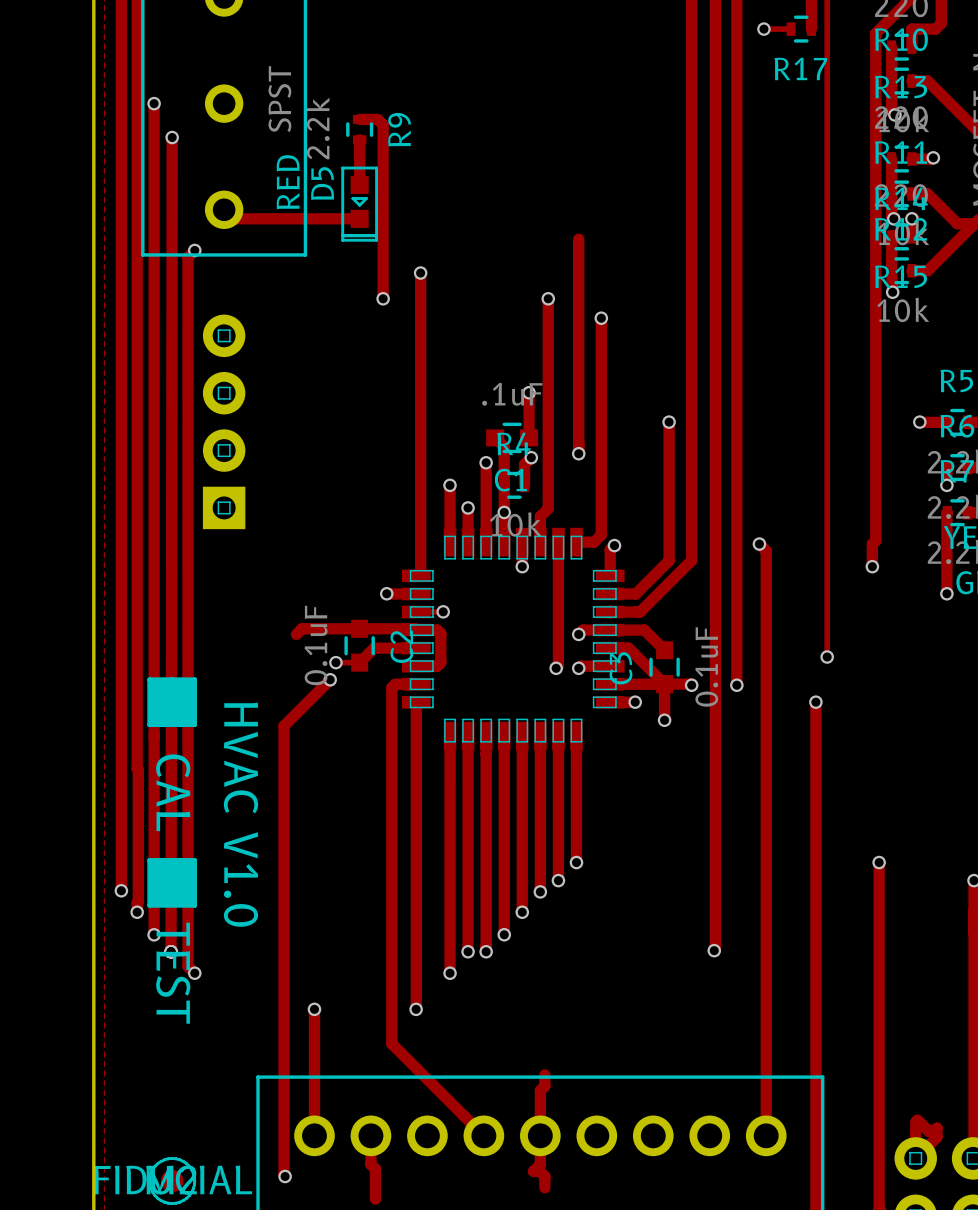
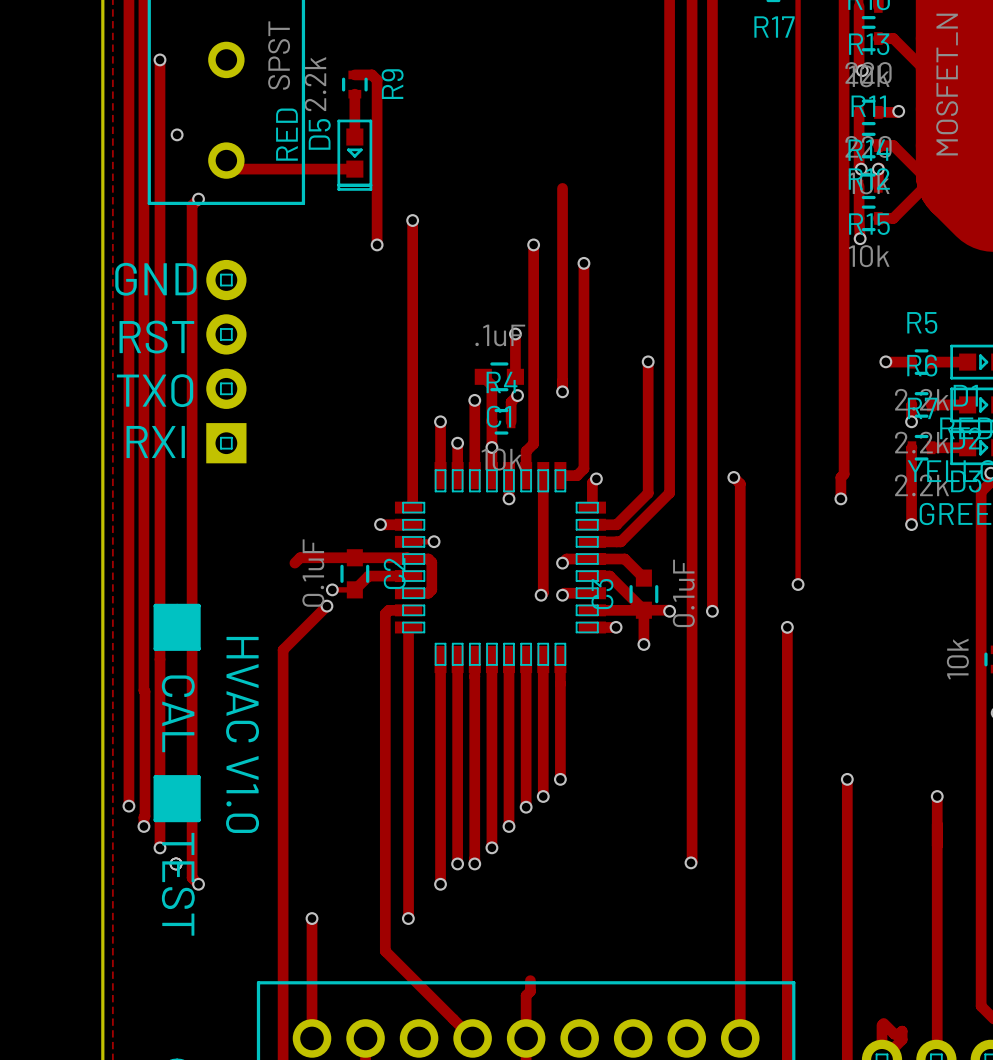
track: (172, 137) (171, 951) -> none
via position: (172, 137) -> (177, 134)
text: none -> GND (155, 279)
text: none -> RST (156, 337)
text: none -> TXO (155, 390)
text: none -> RXI (155, 442)

